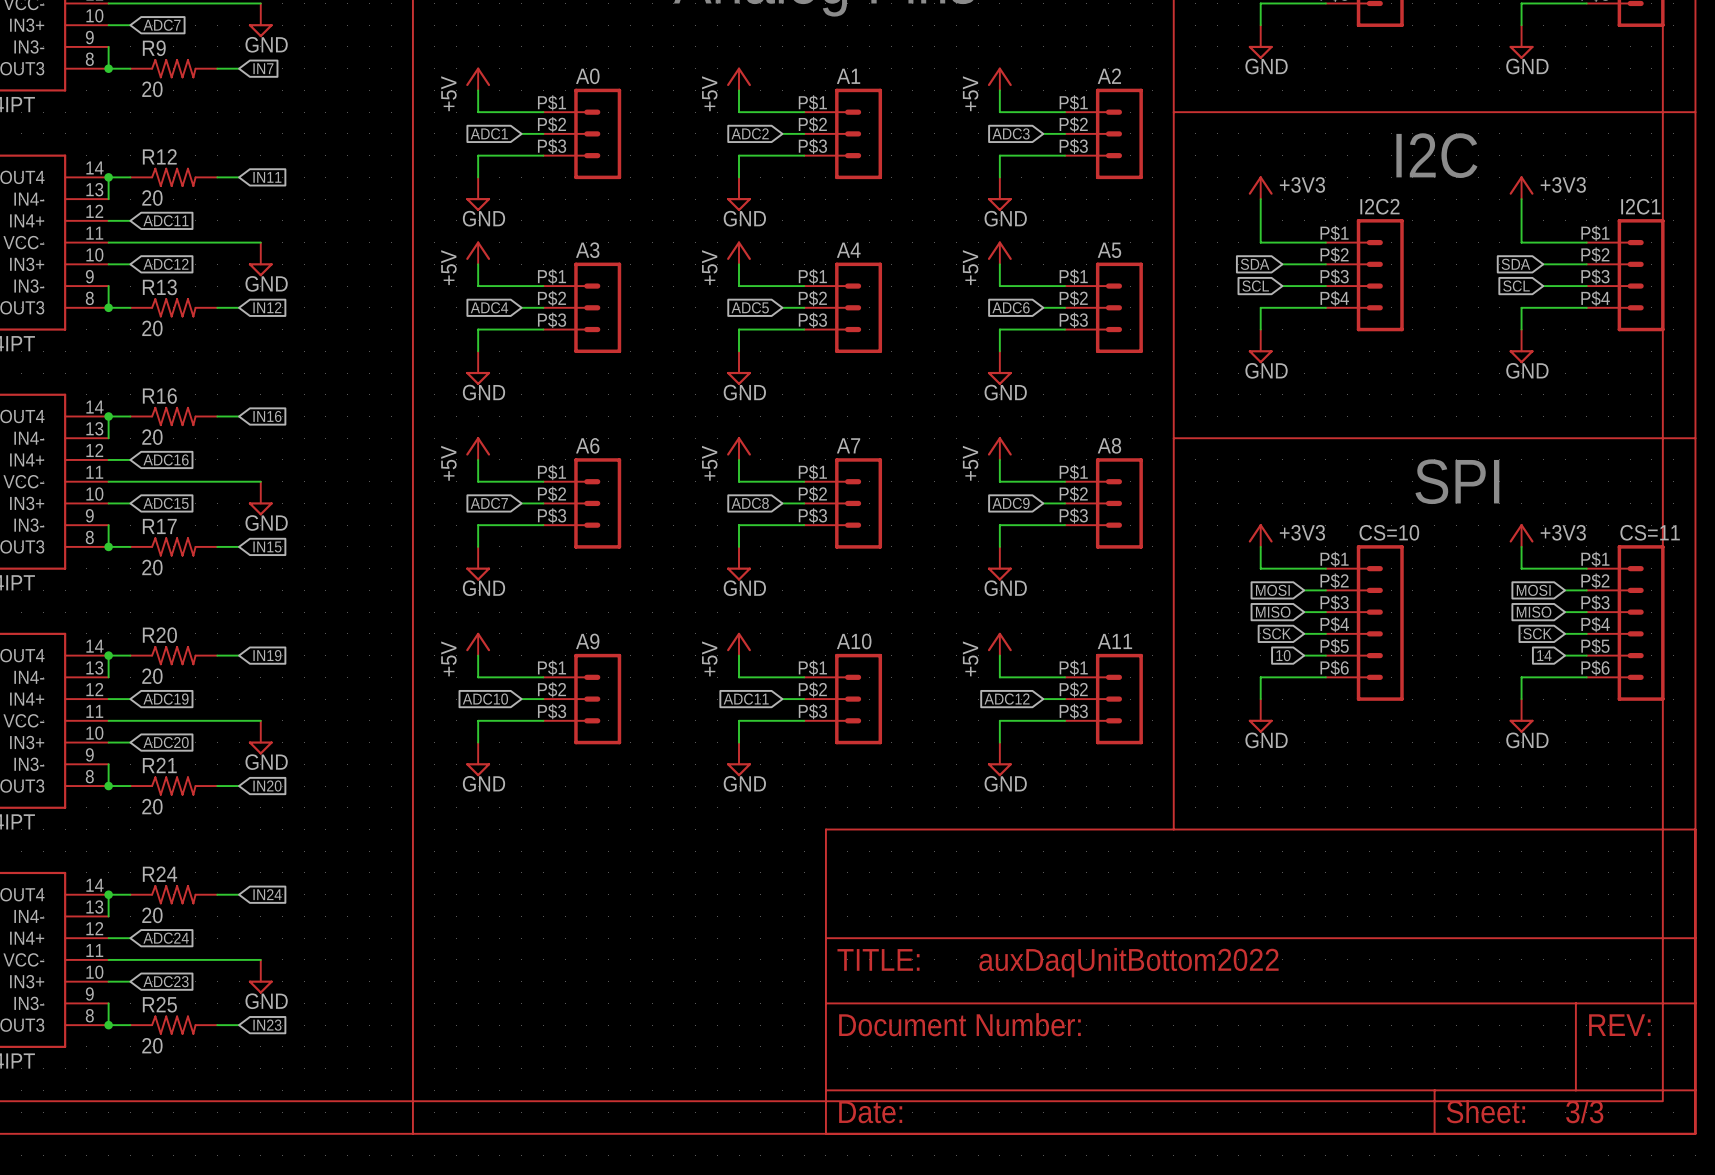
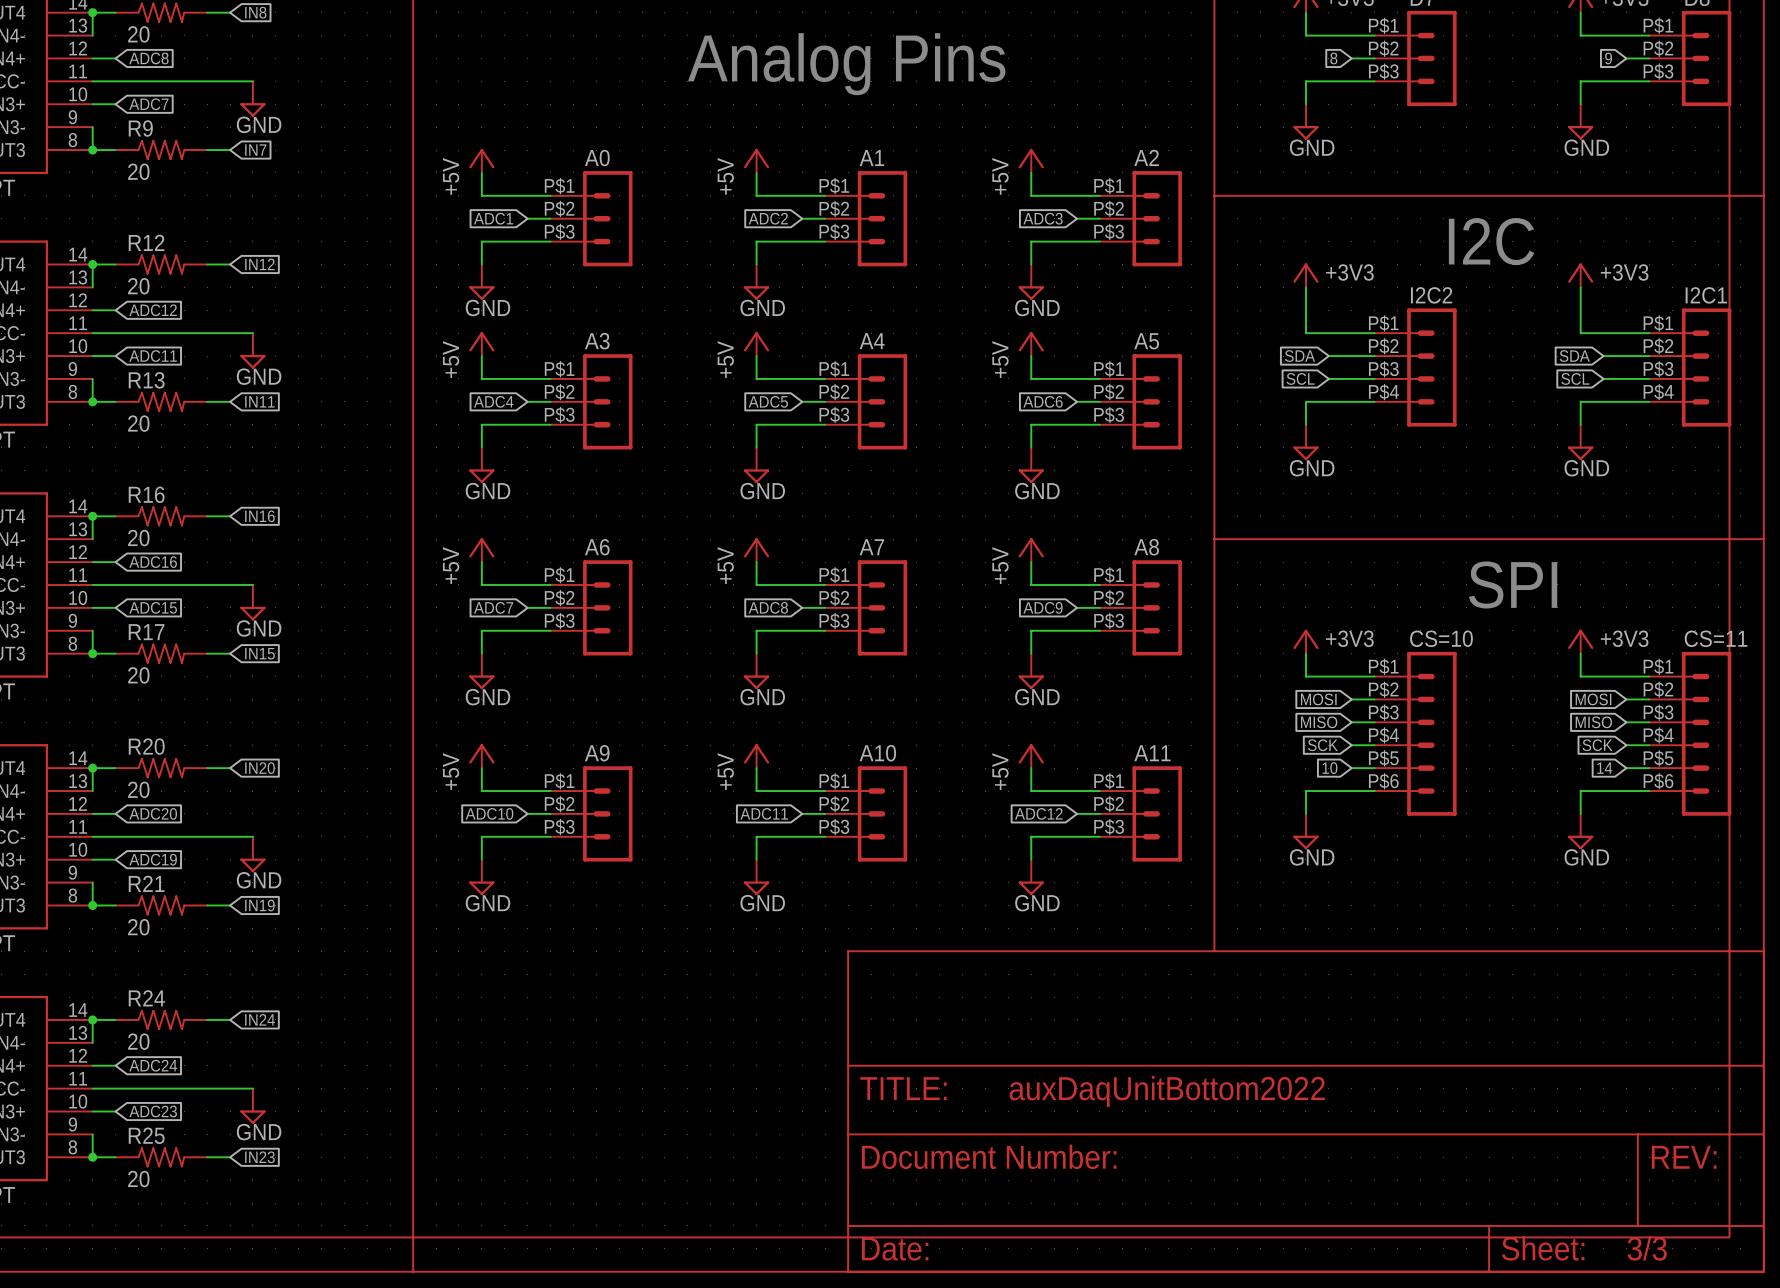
global label: IN11 (267, 177) -> IN12 (259, 264)
global label: ADC11 (165, 220) -> ADC12 (153, 310)
global label: ADC12 (165, 264) -> ADC11 (153, 356)
global label: IN12 (267, 307) -> IN11 (259, 401)
global label: IN19 (267, 655) -> IN20 (259, 768)
global label: ADC19 (165, 699) -> ADC20 (153, 813)
global label: ADC20 (166, 742) -> ADC19 (153, 859)
global label: IN20 (267, 786) -> IN19 (259, 905)

